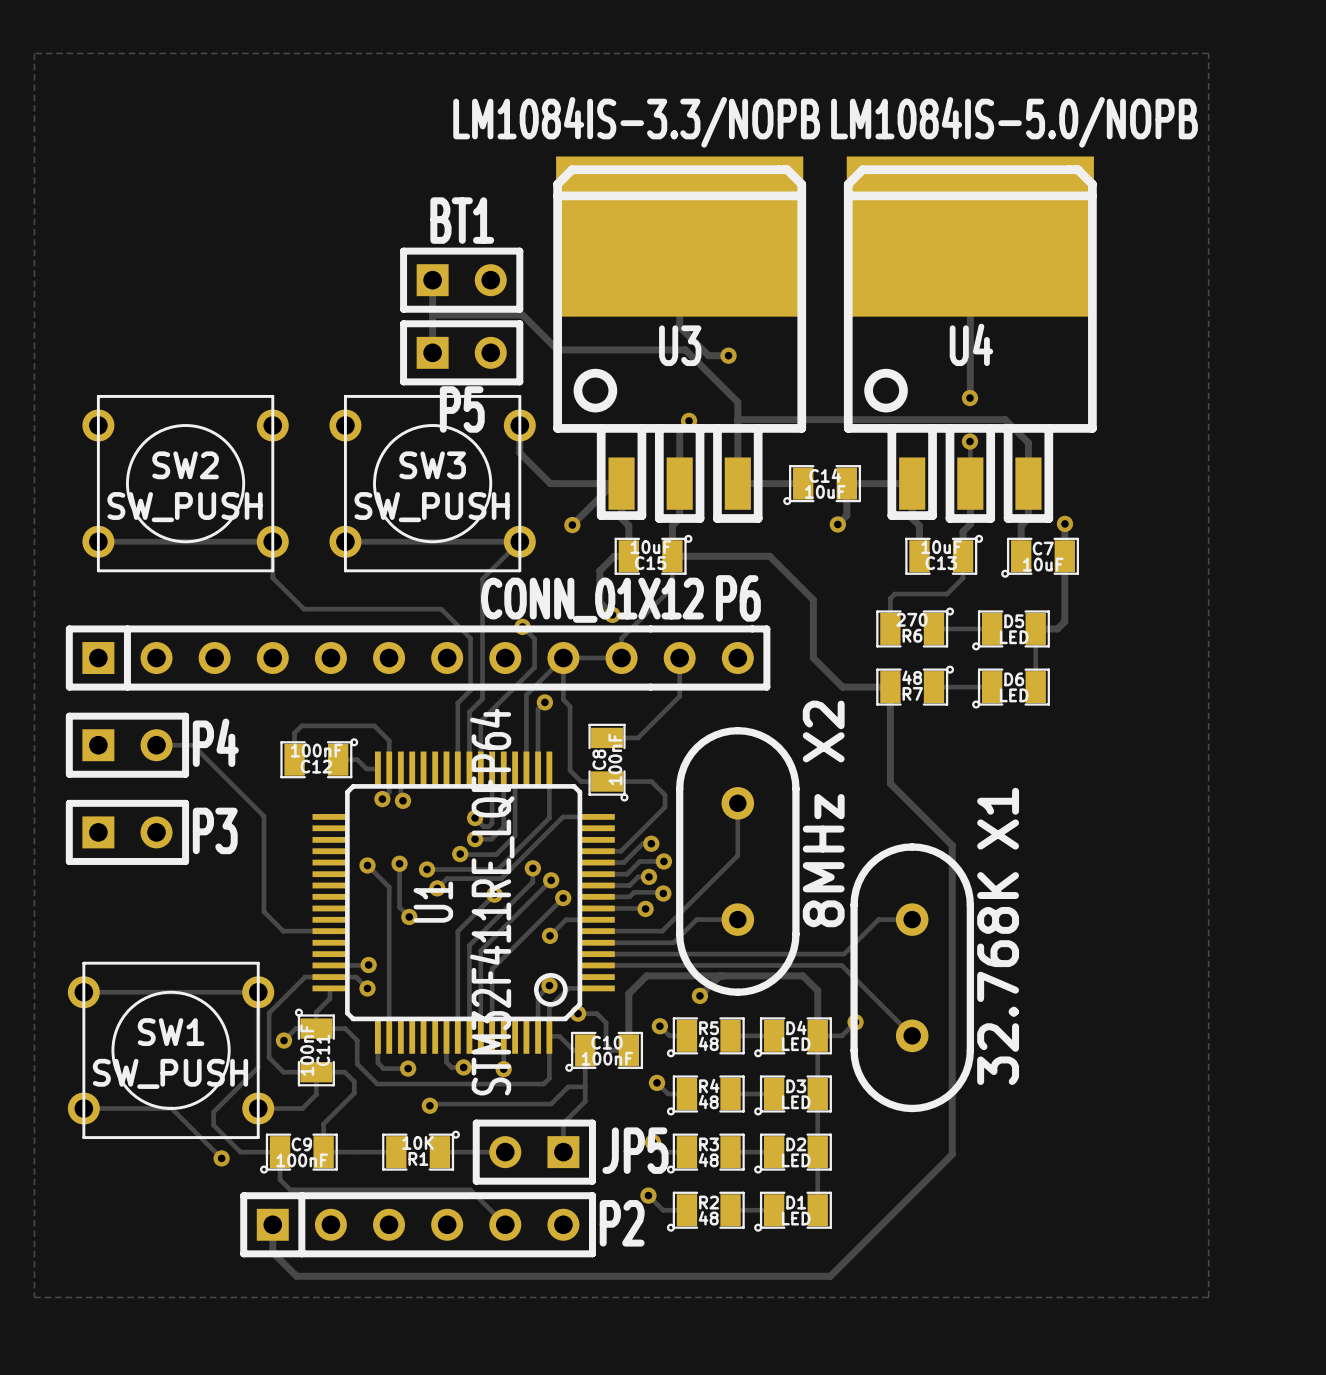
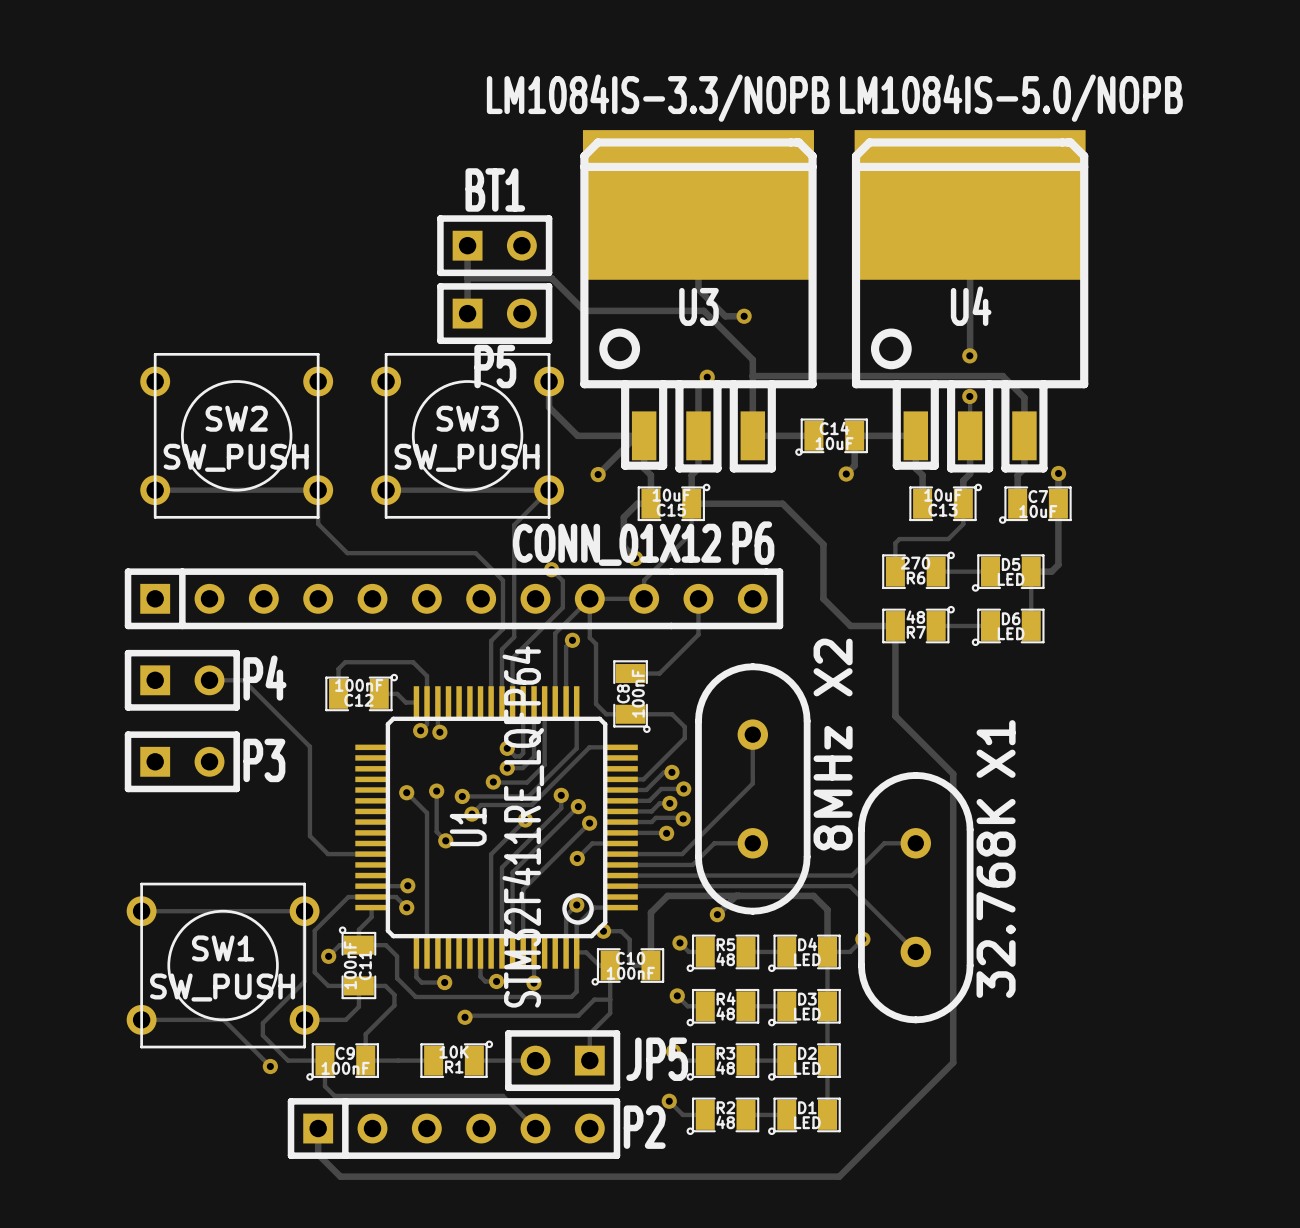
zone outline: (34, 53) (1208, 53) (1208, 1297) (34, 1297) (34, 53) -> none

